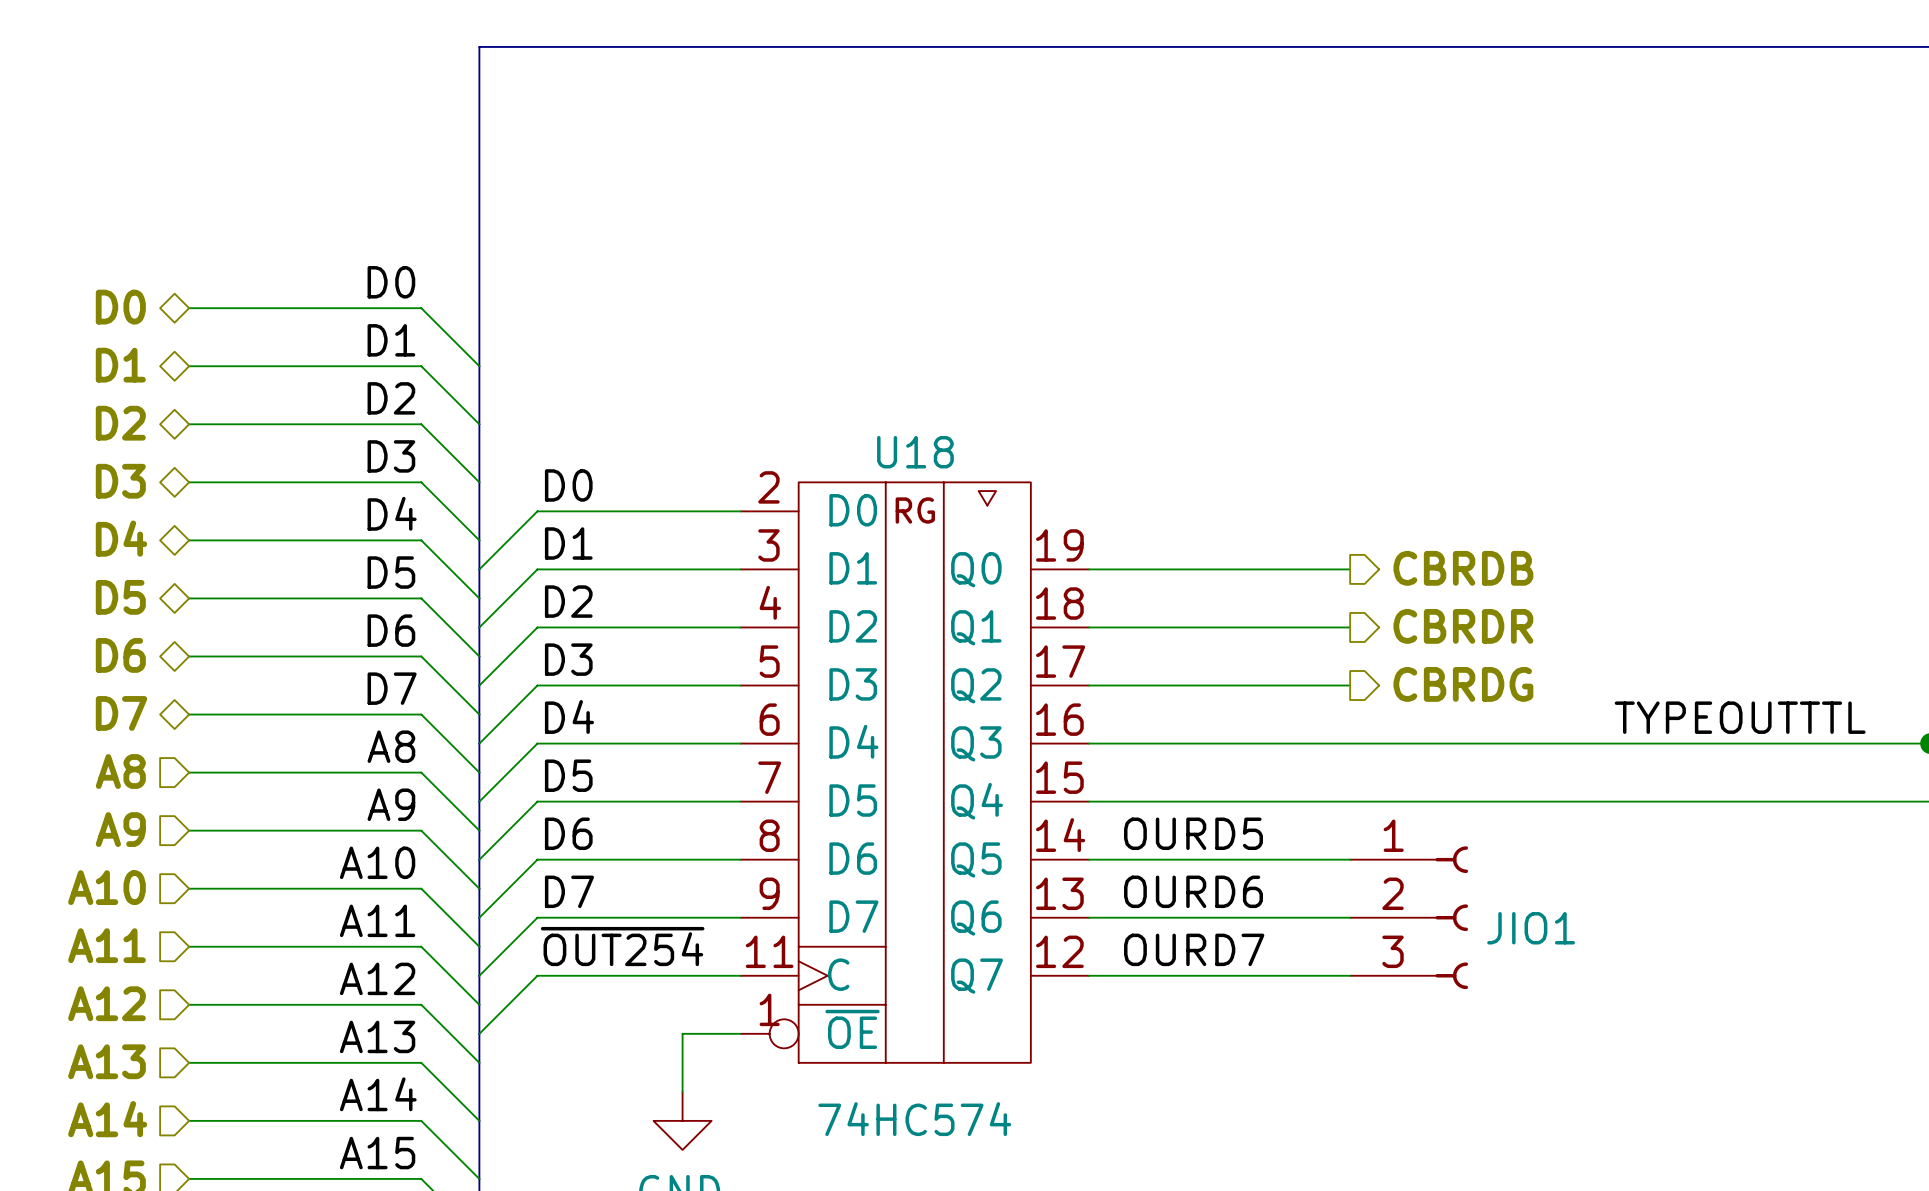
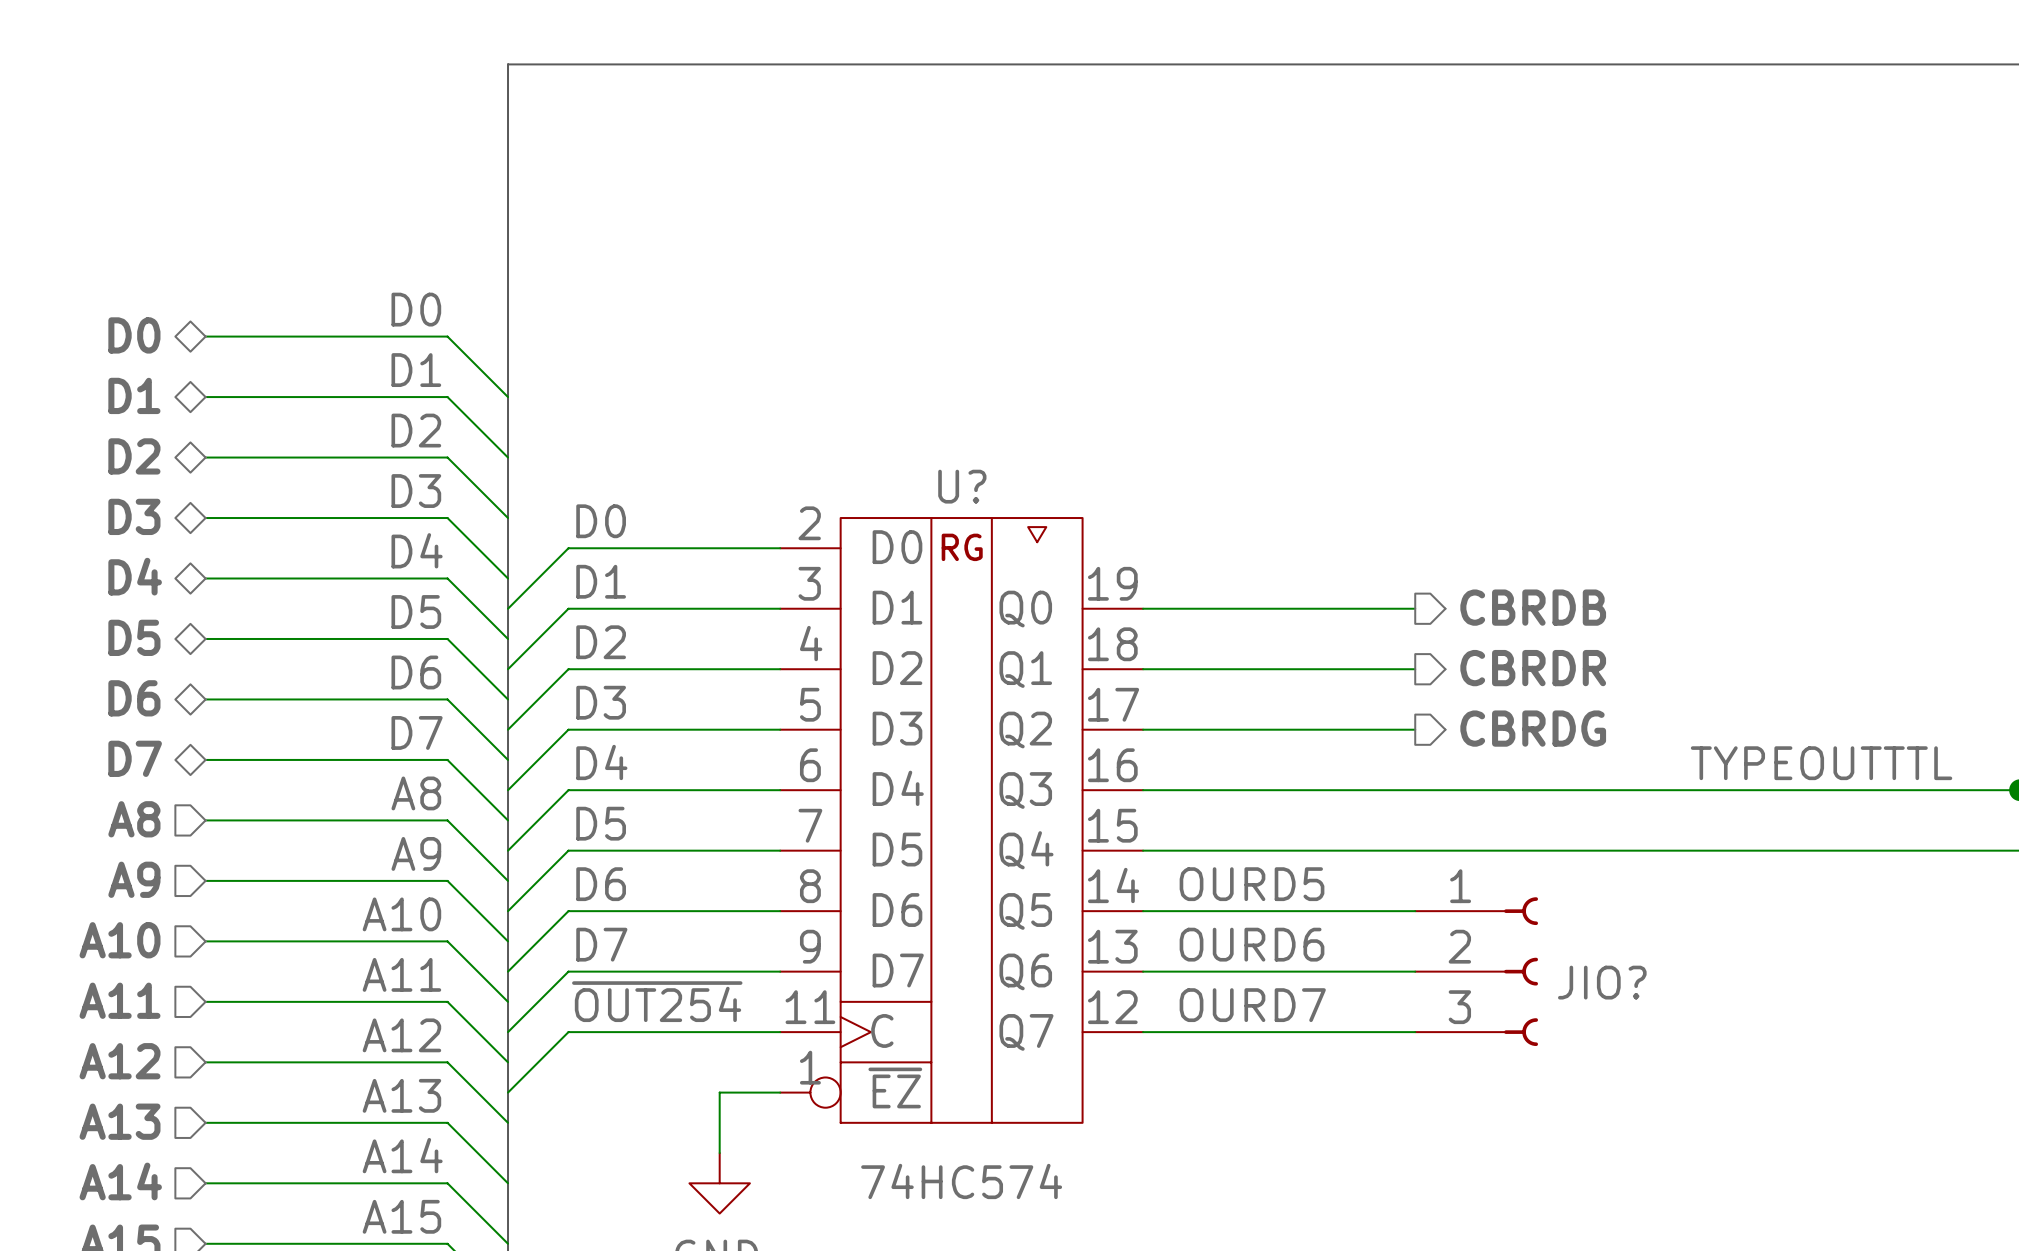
U18 name: U18 (915, 452) -> U? (962, 486)
JIO1 name: JIO1 (1531, 928) -> JIO? (1602, 982)
U18 pin name: ~{OE} (852, 1029) -> ~{EZ} (895, 1087)

